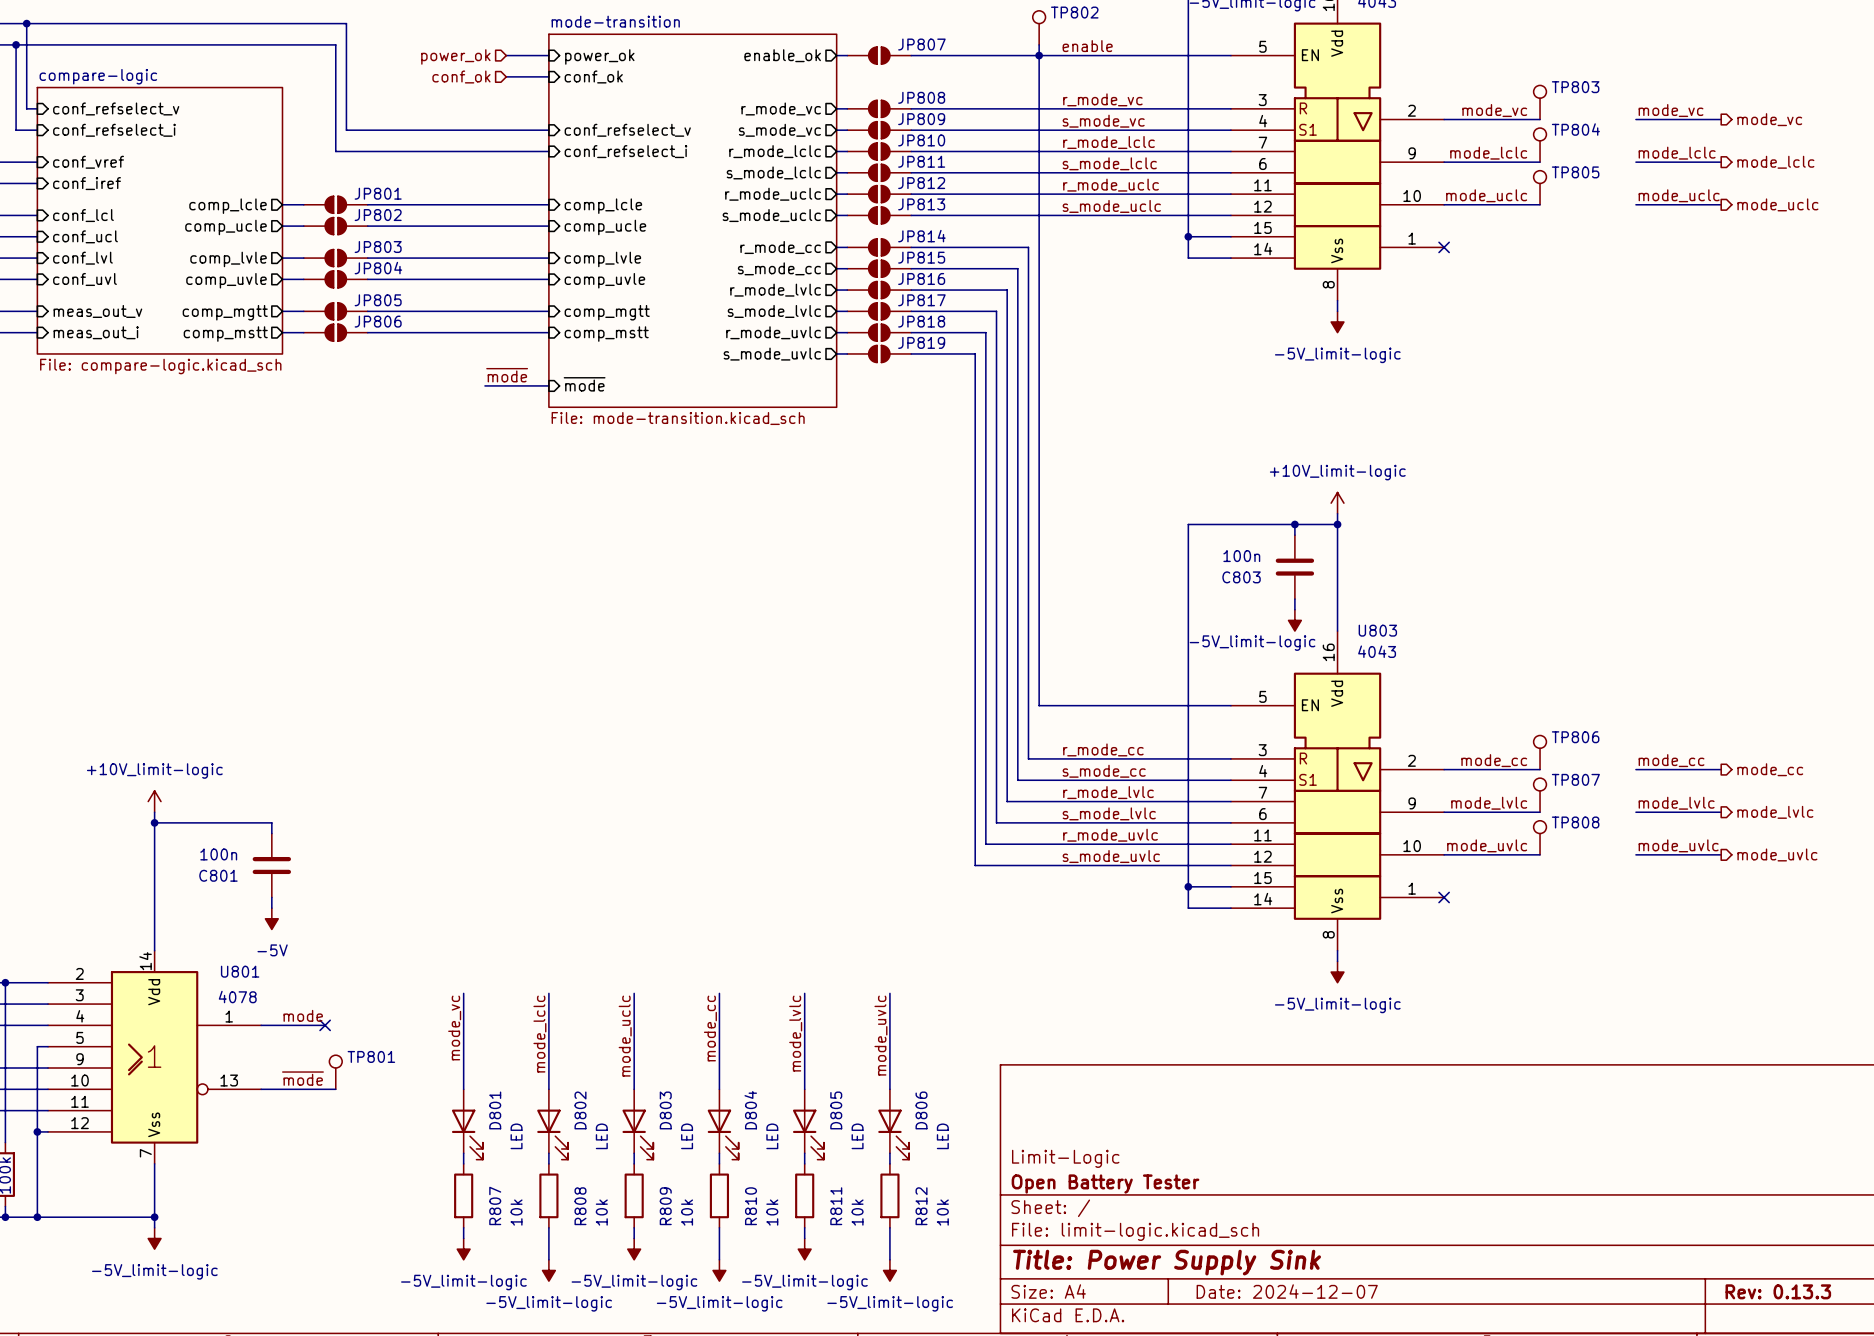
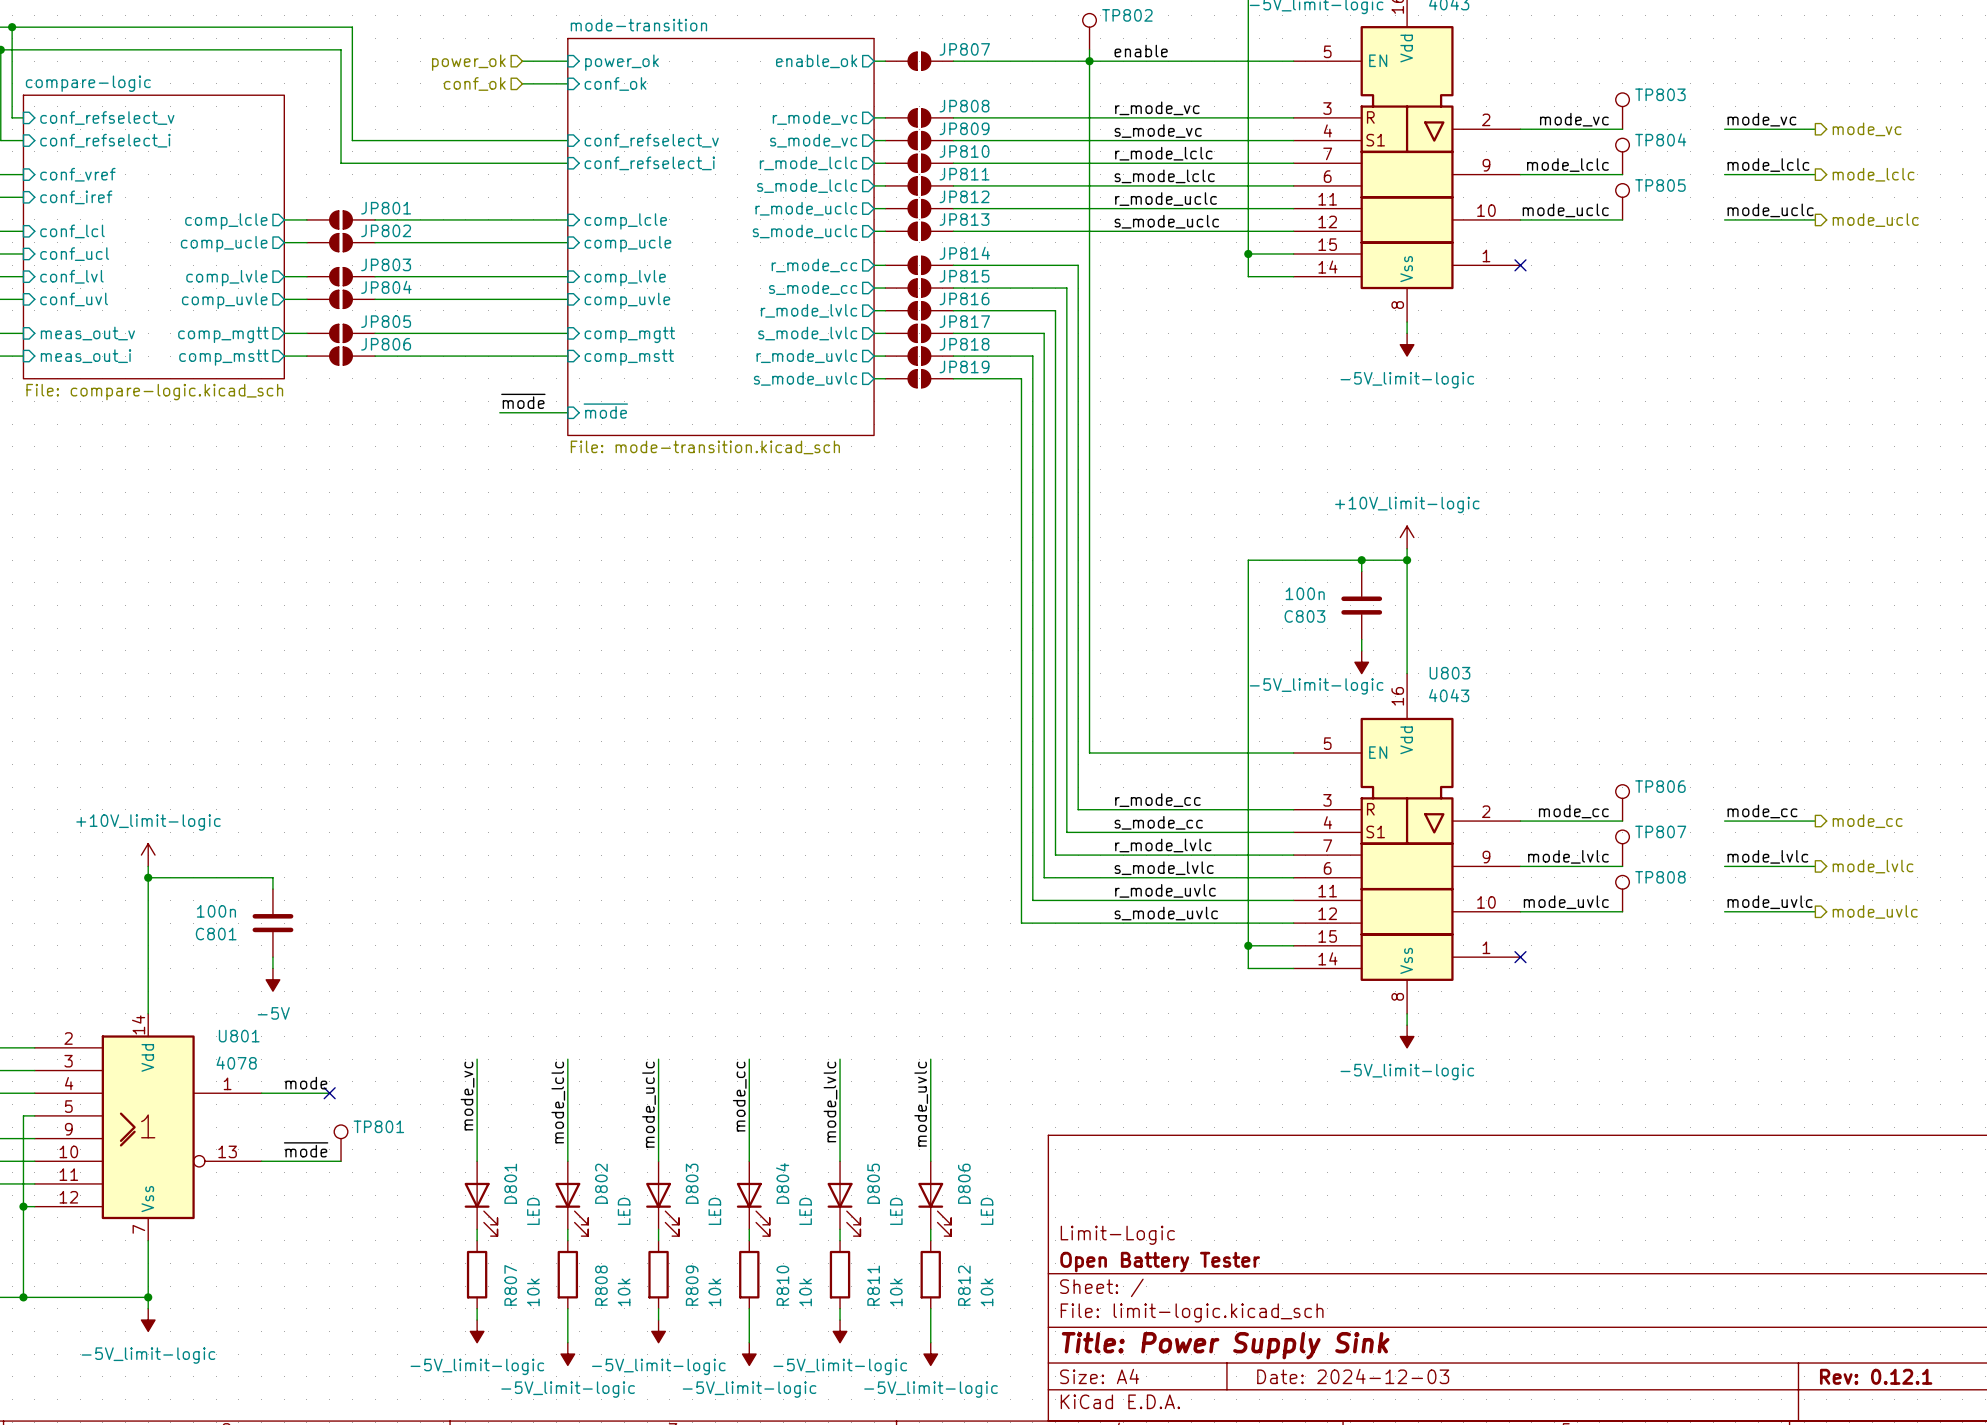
title block: Date: 2024-12-07 (1287, 1291) -> Date: 2024-12-03 (1353, 1376)
title block: Rev: 0.13.3 (1778, 1291) -> Rev: 0.12.1 (1876, 1376)

